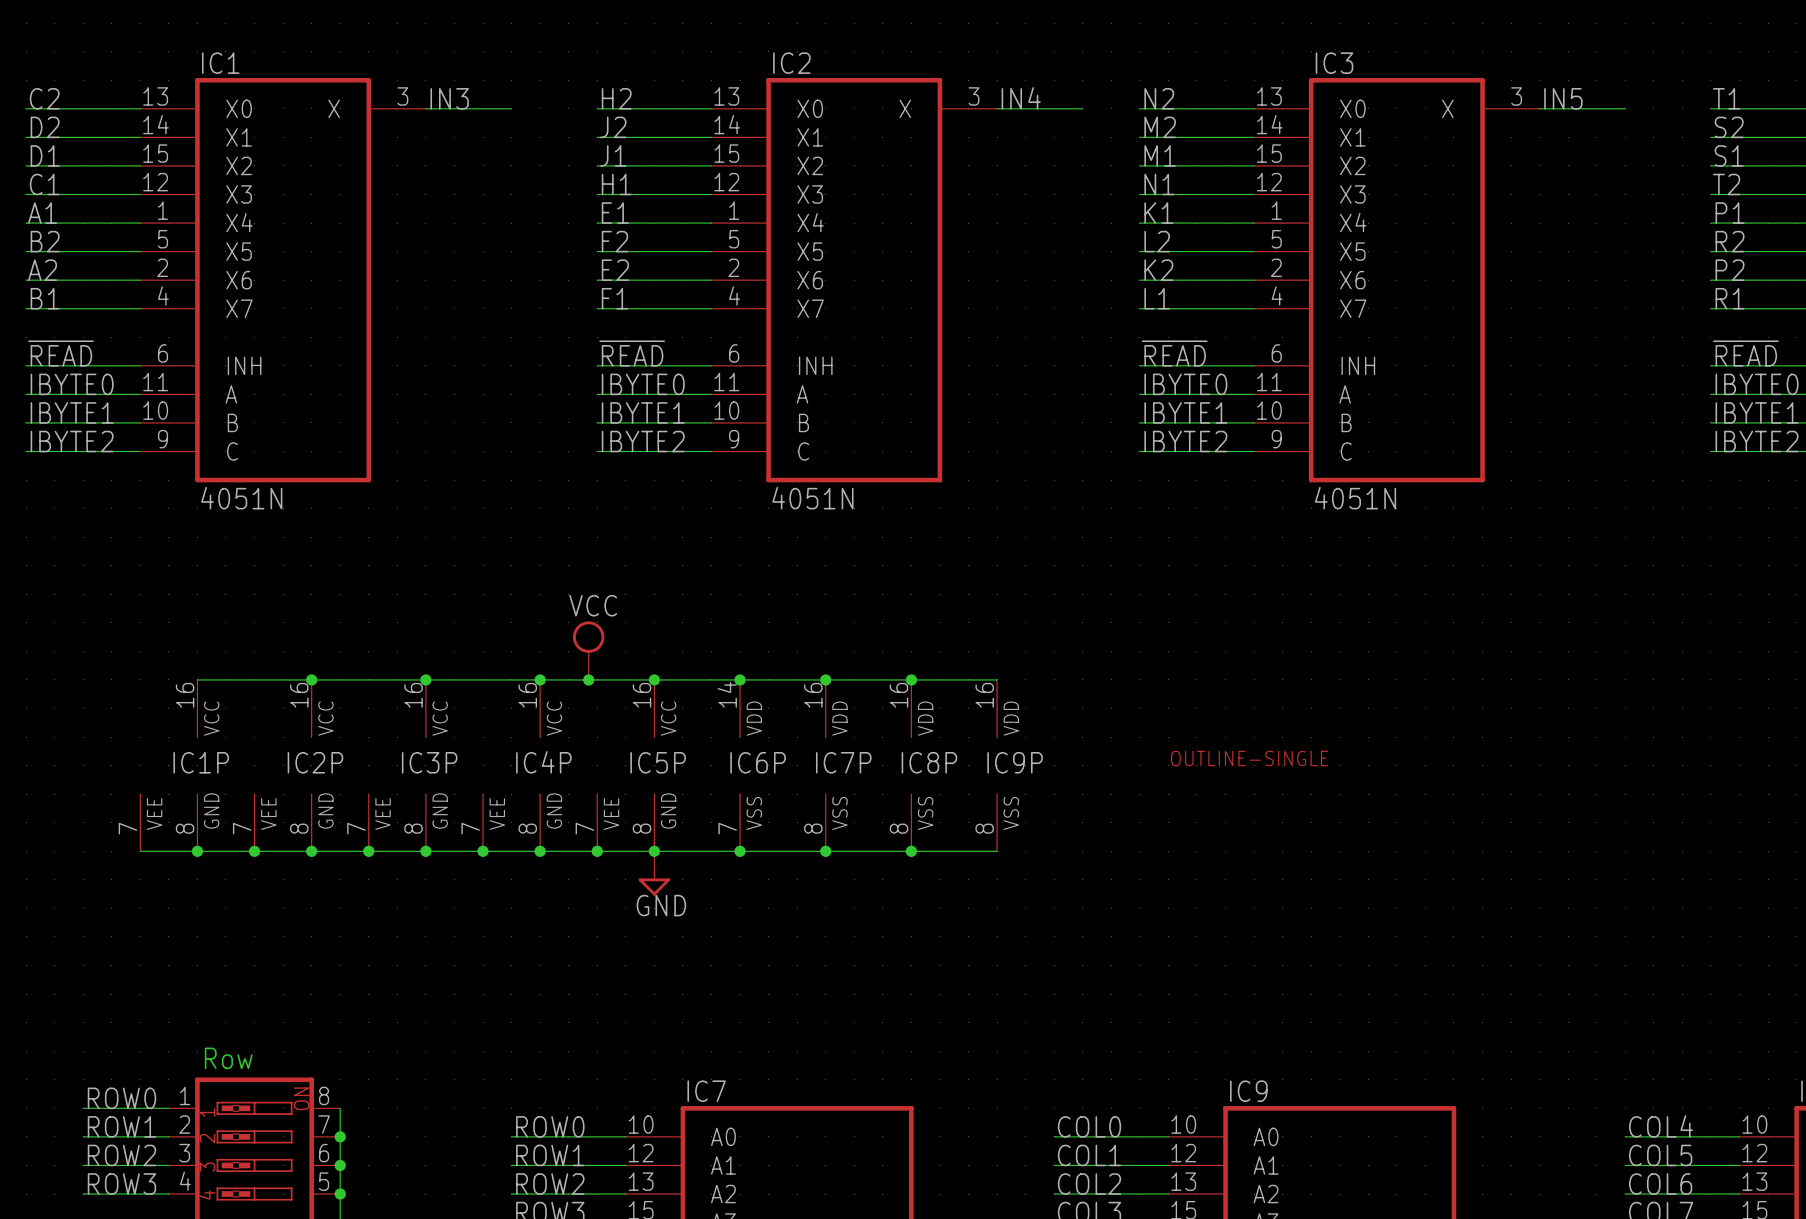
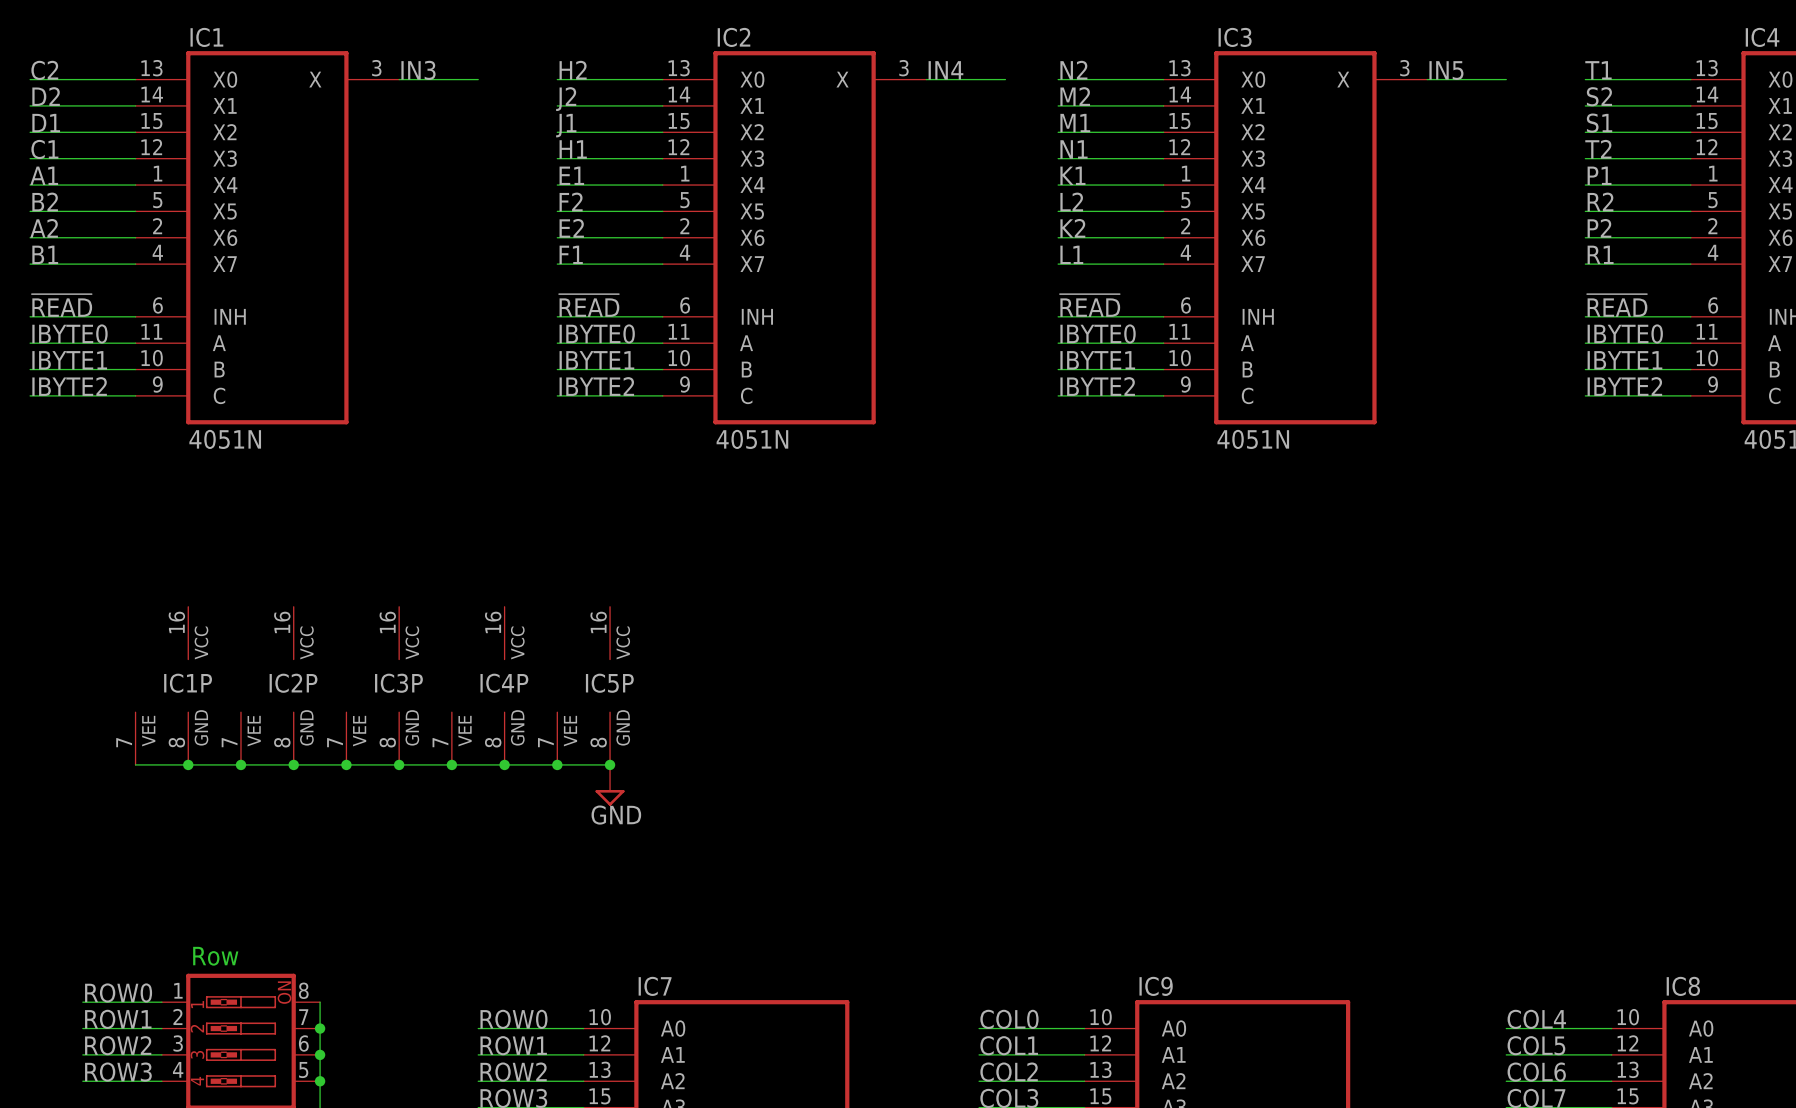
power symbol: VCC (588, 650) -> none
wire: (197, 679) (997, 679) -> none
junction: (311, 679) -> none
junction: (425, 679) -> none
junction: (540, 679) -> none
junction: (588, 679) -> none
junction: (654, 679) -> none
junction: (740, 679) -> none
junction: (825, 679) -> none
junction: (911, 679) -> none
part: OUTLINE-SINGLE (1249, 758) -> none
IC6P: (740, 765) -> none
IC7P: (825, 765) -> none
IC8P: (911, 765) -> none
IC9P: (997, 765) -> none
wire: (654, 851) (997, 851) -> none
junction: (740, 851) -> none
junction: (825, 851) -> none
junction: (911, 851) -> none

